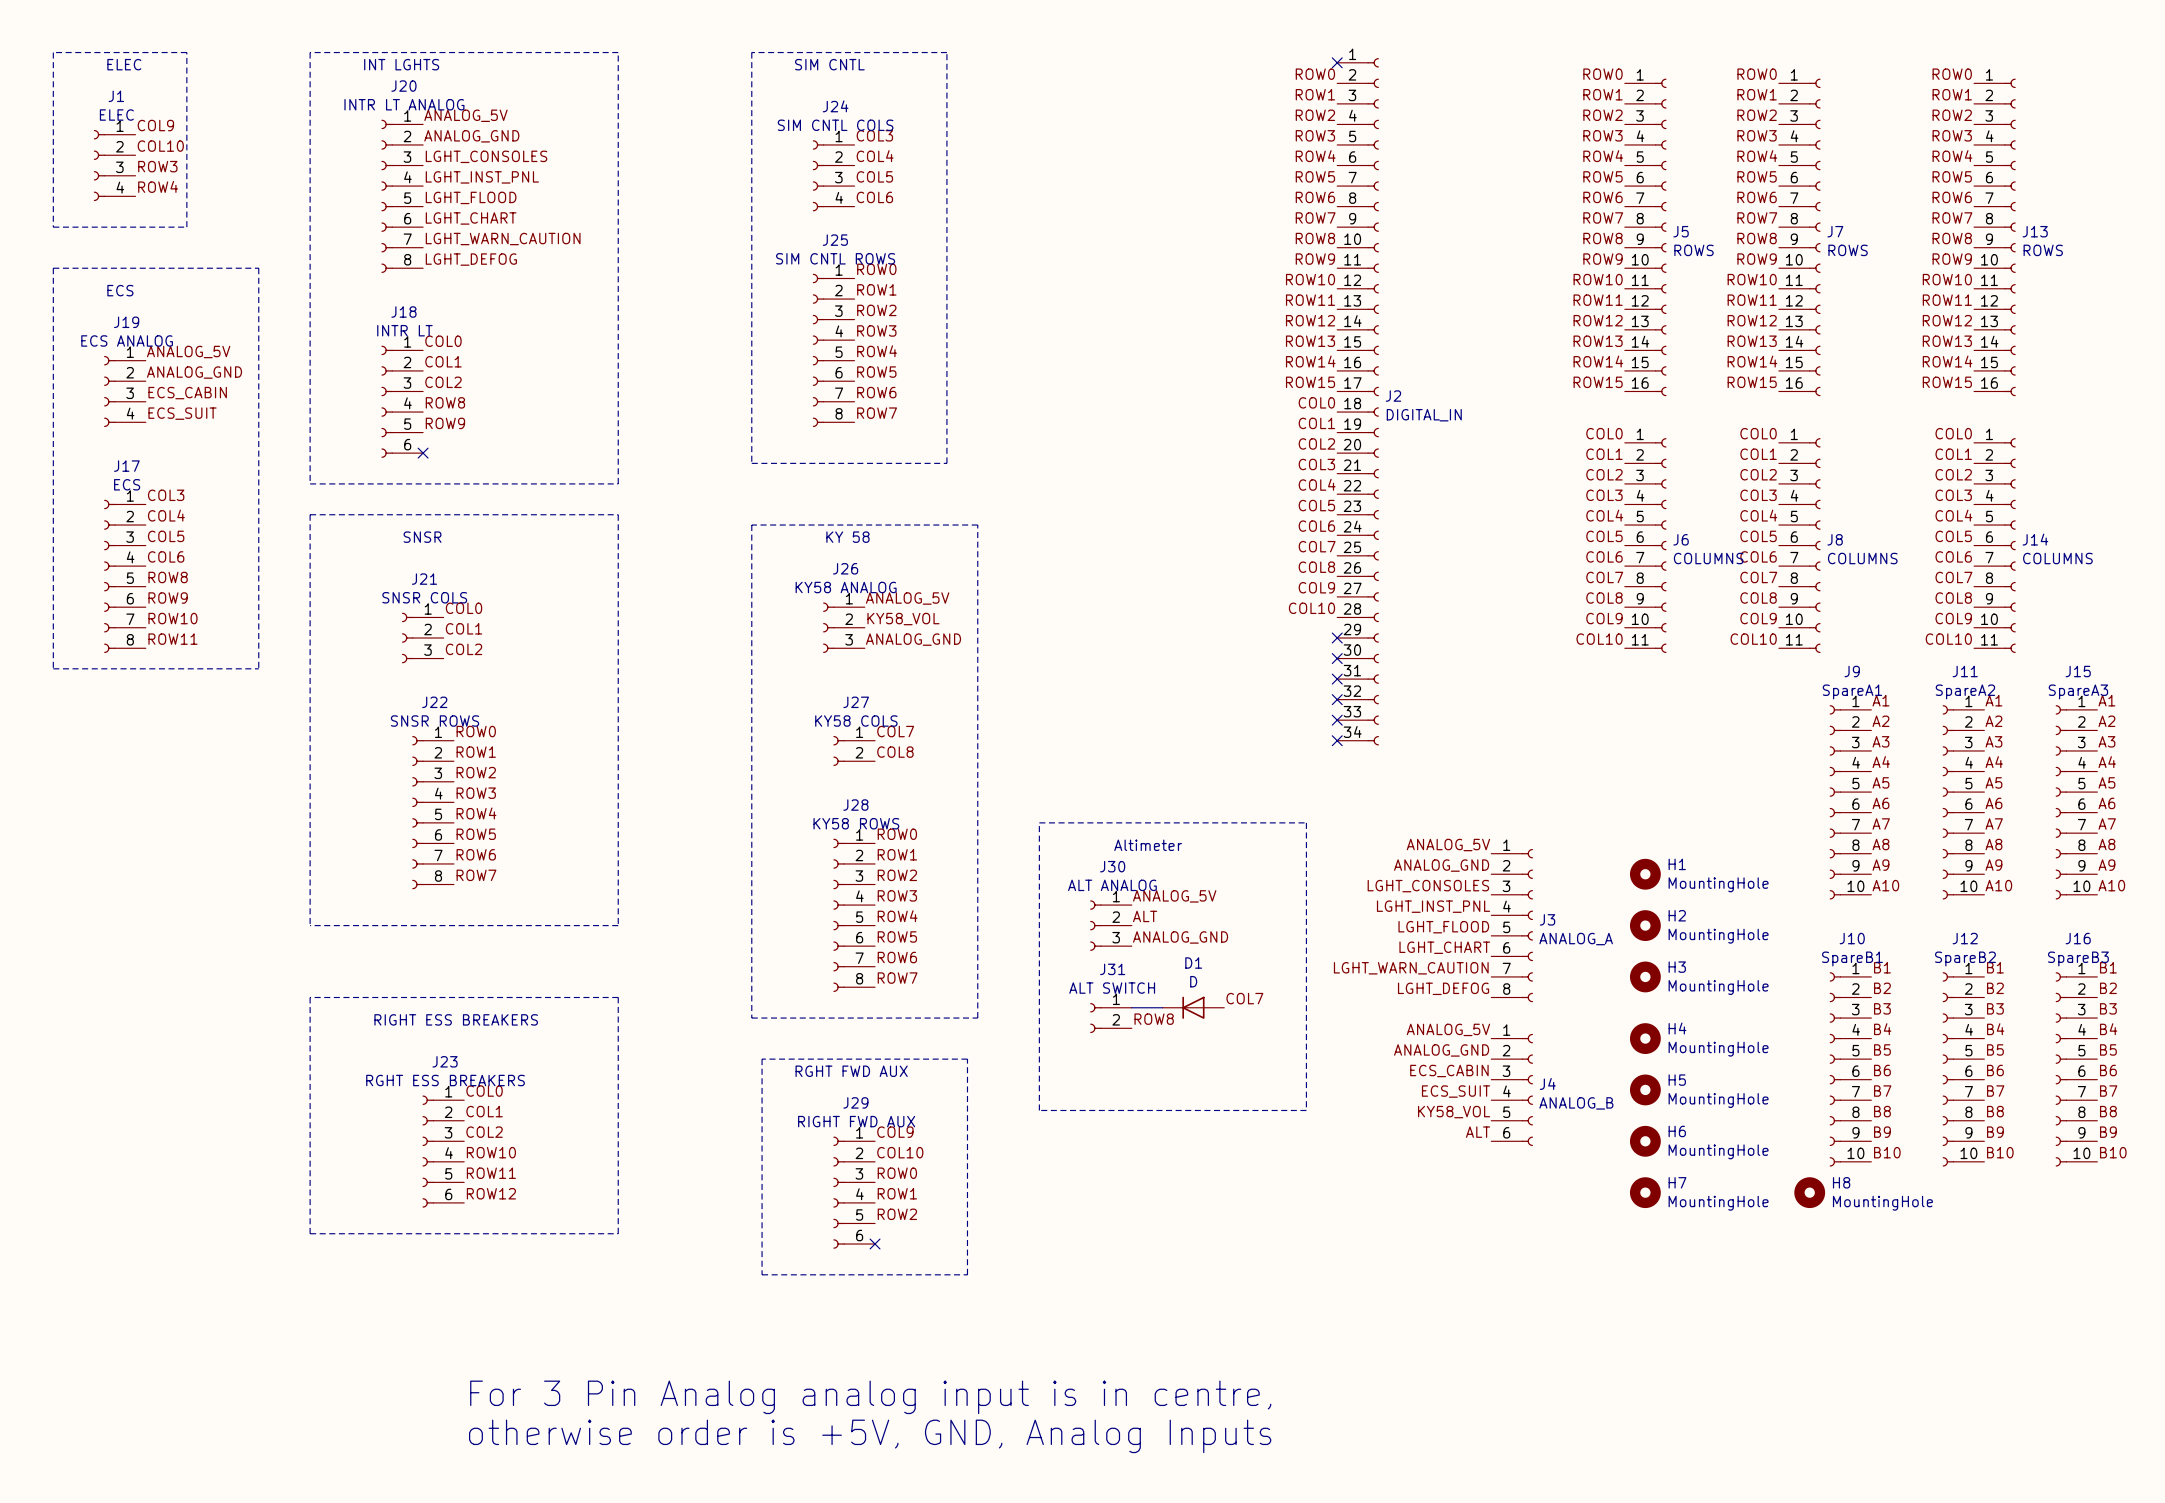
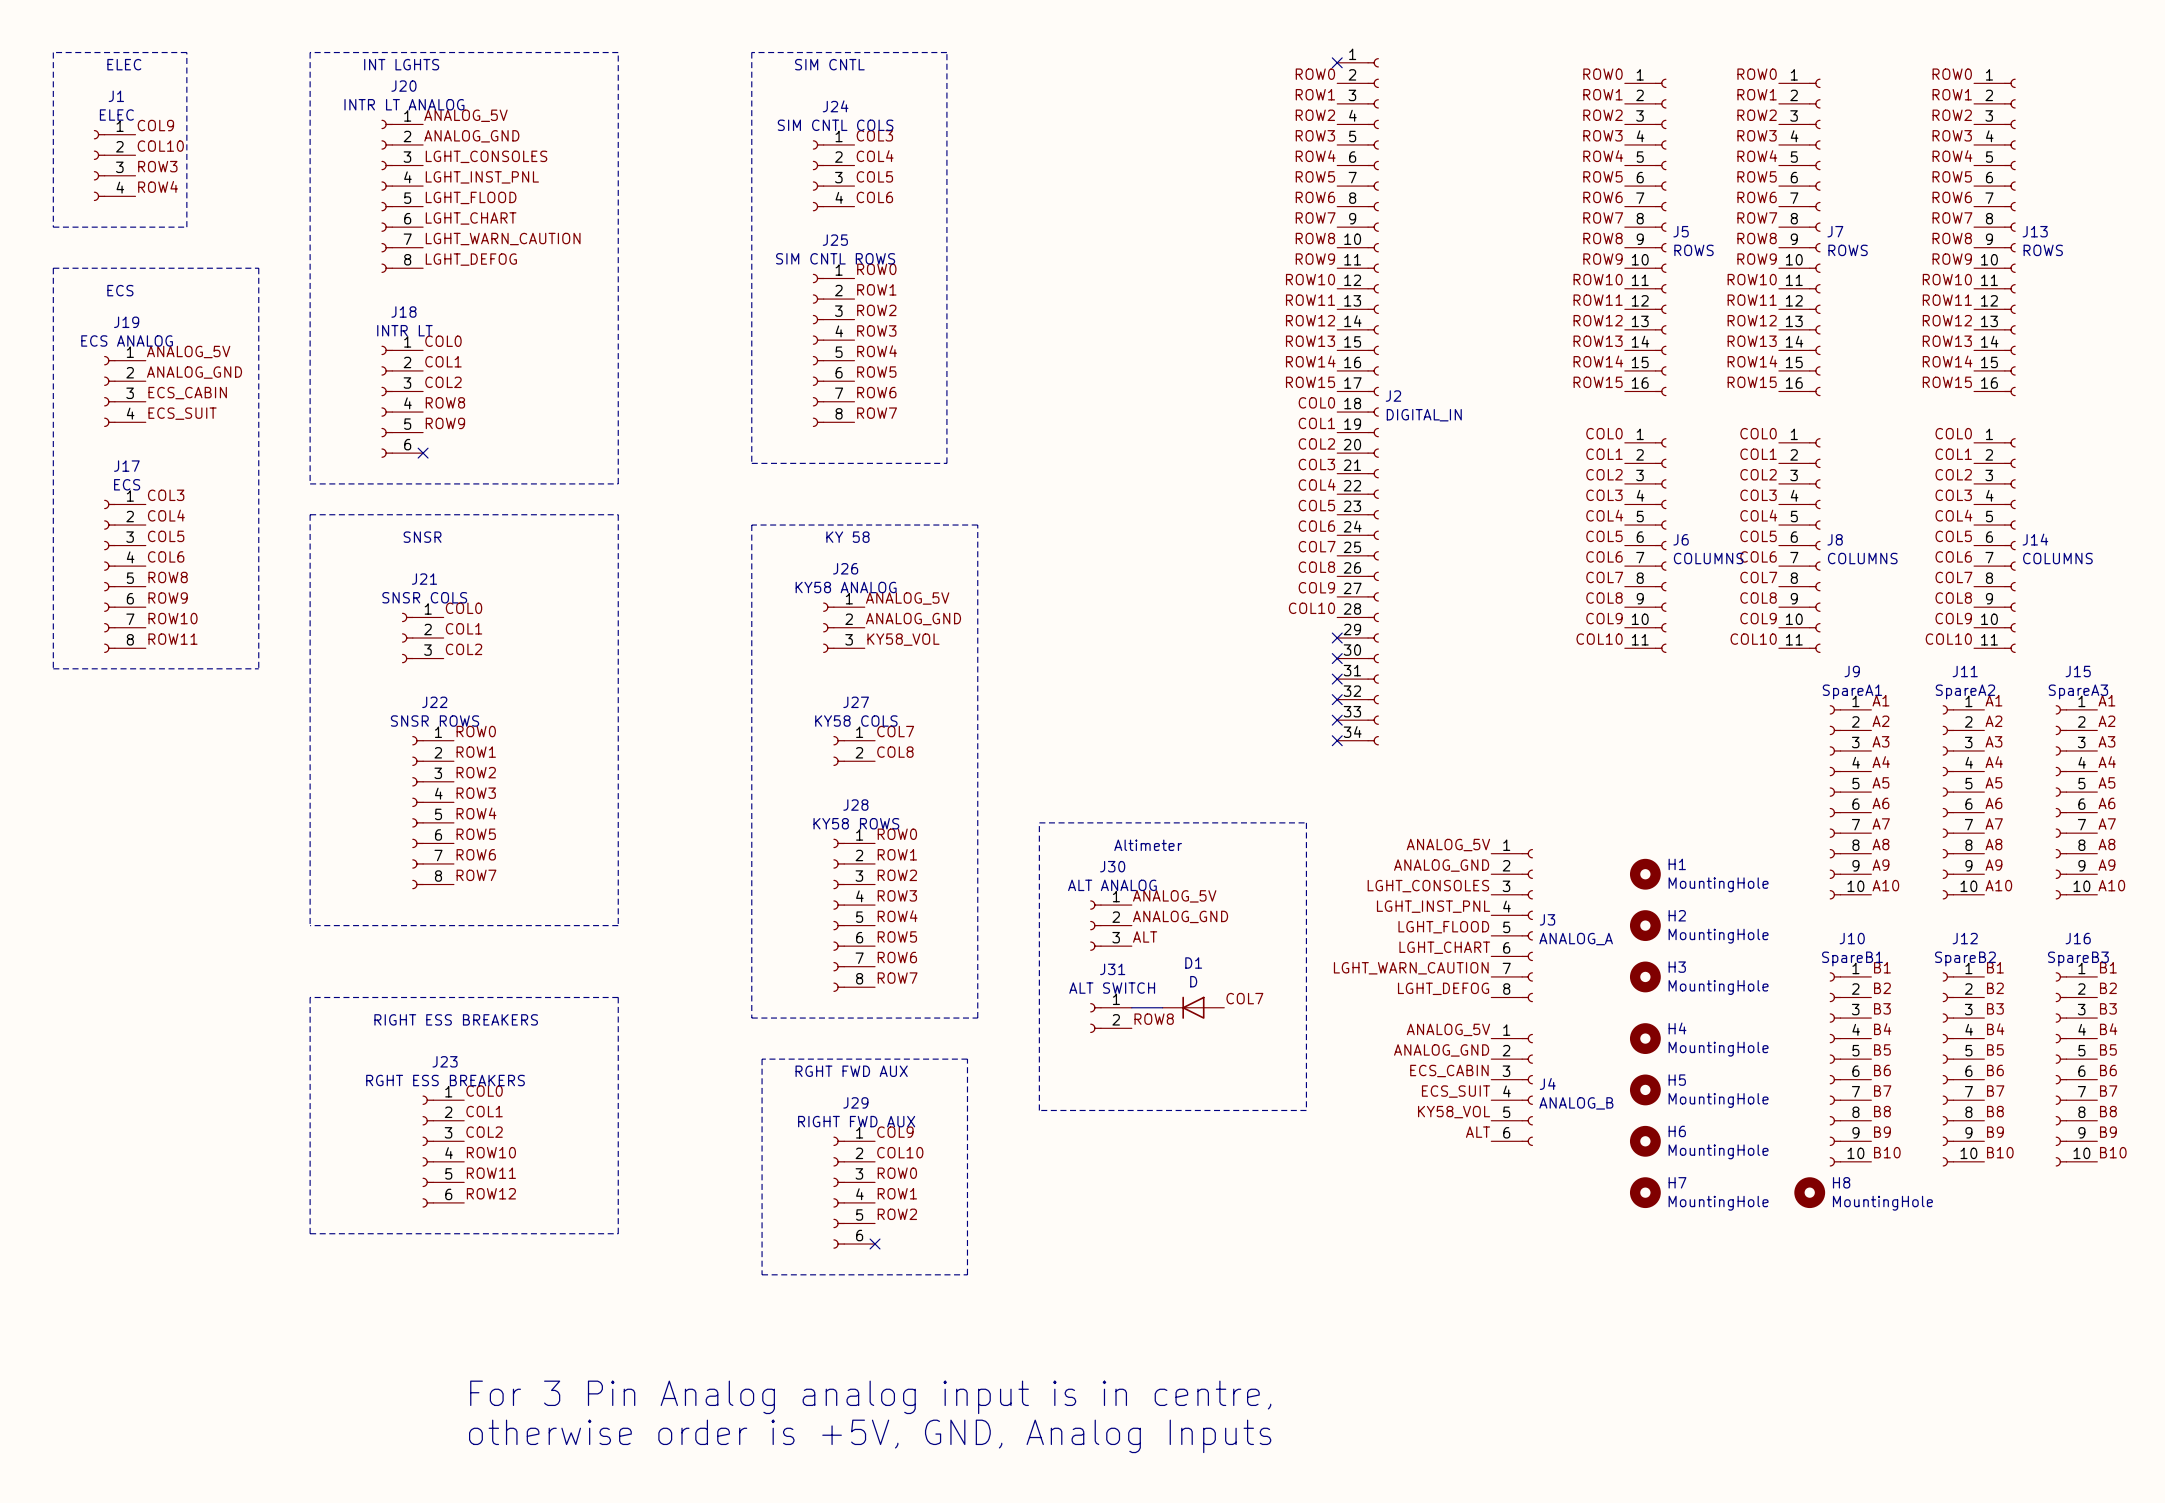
label: KY58_VOL (903, 619) -> ANALOG_GND (913, 619)
label: ANALOG_GND (913, 639) -> KY58_VOL (903, 639)
label: ALT (1145, 916) -> ANALOG_GND (1180, 916)
label: ANALOG_GND (1180, 937) -> ALT (1145, 936)

